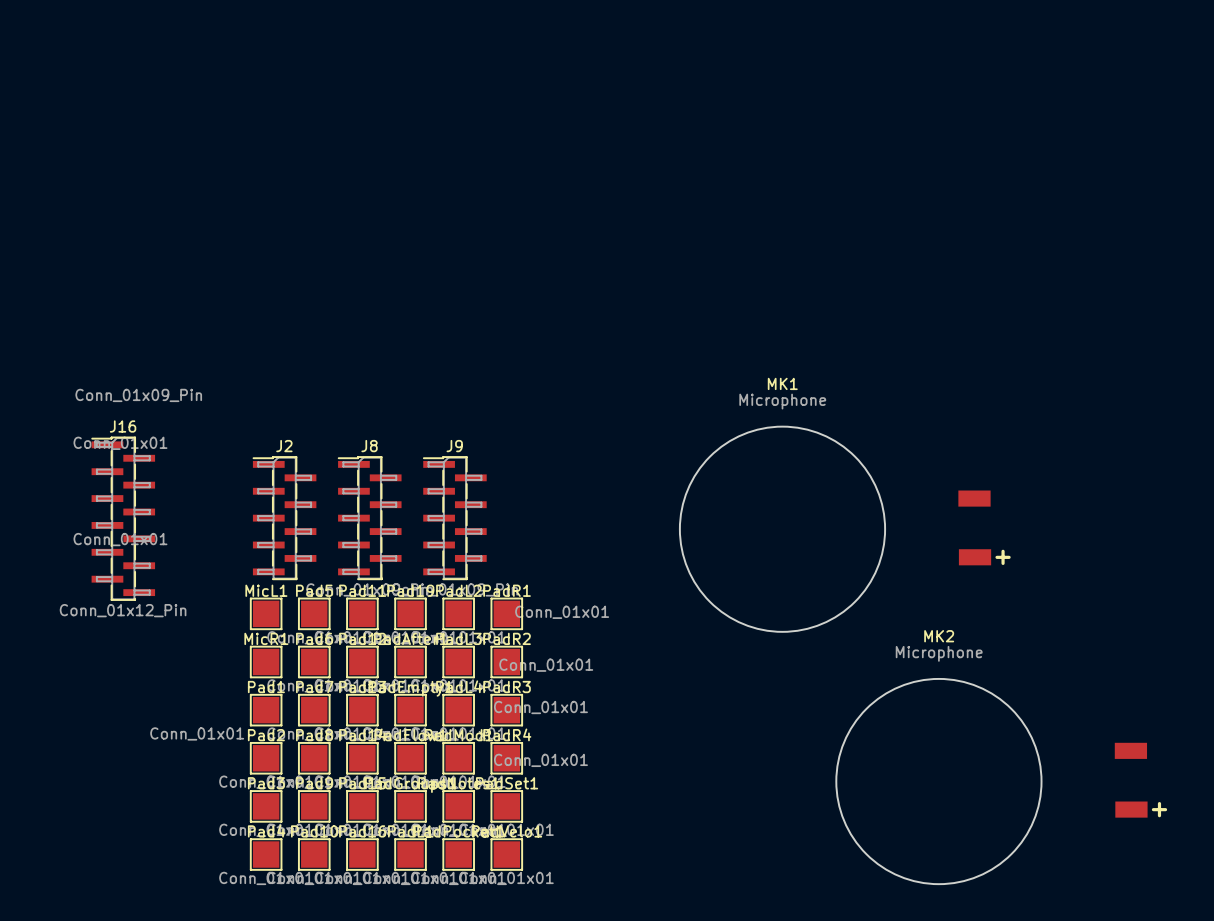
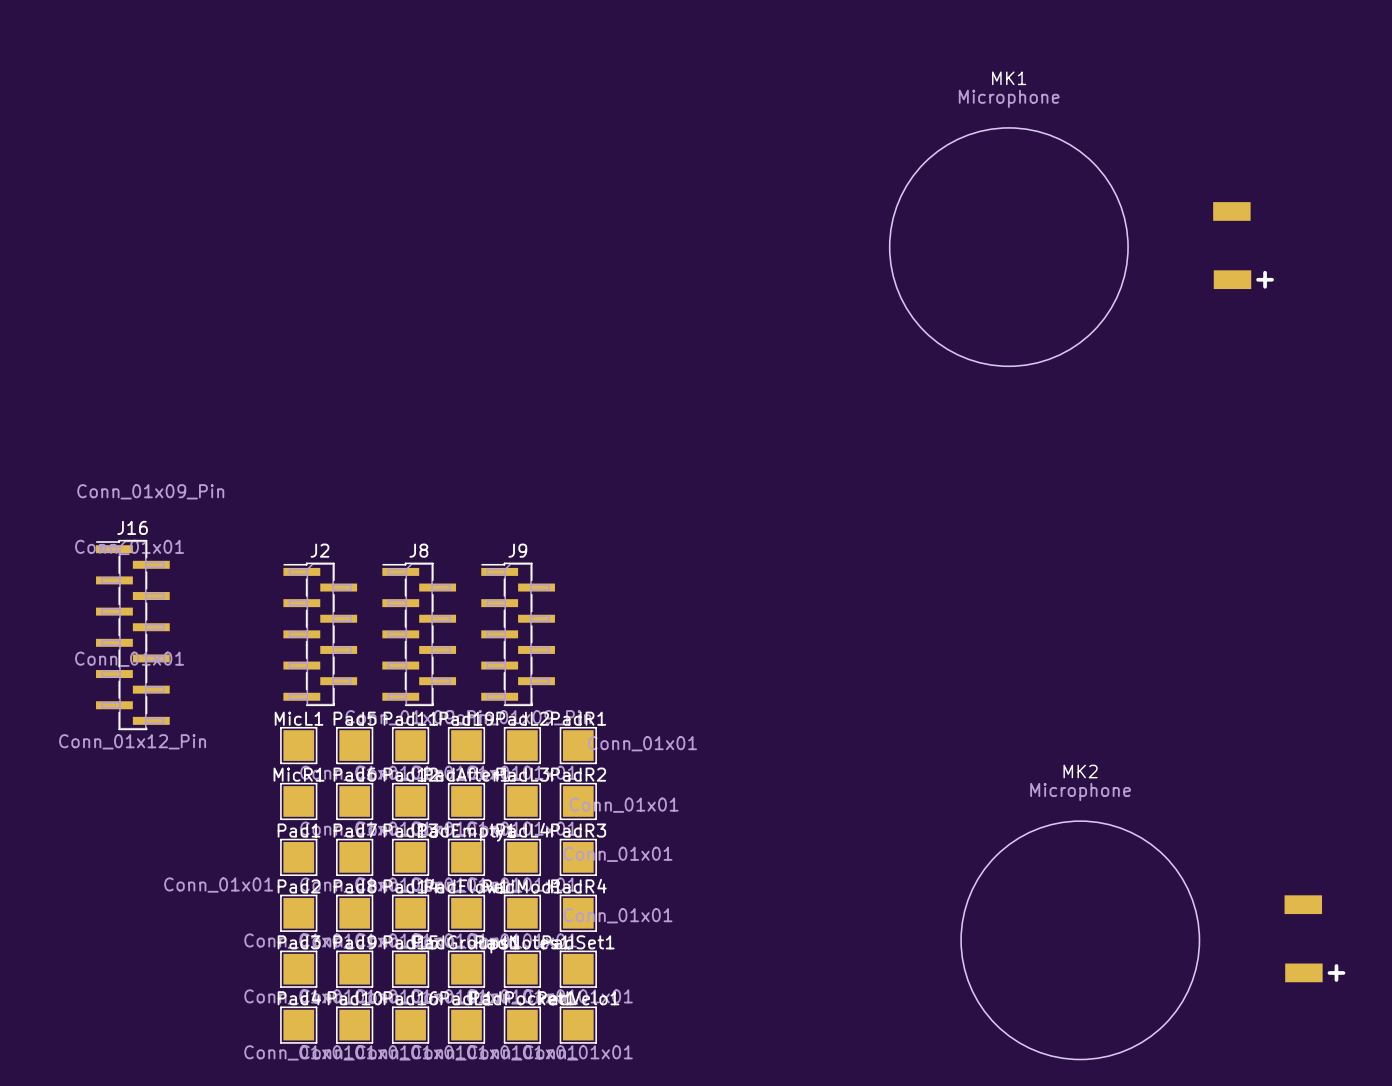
MK1 position: (835, 529) -> (1070, 247)

